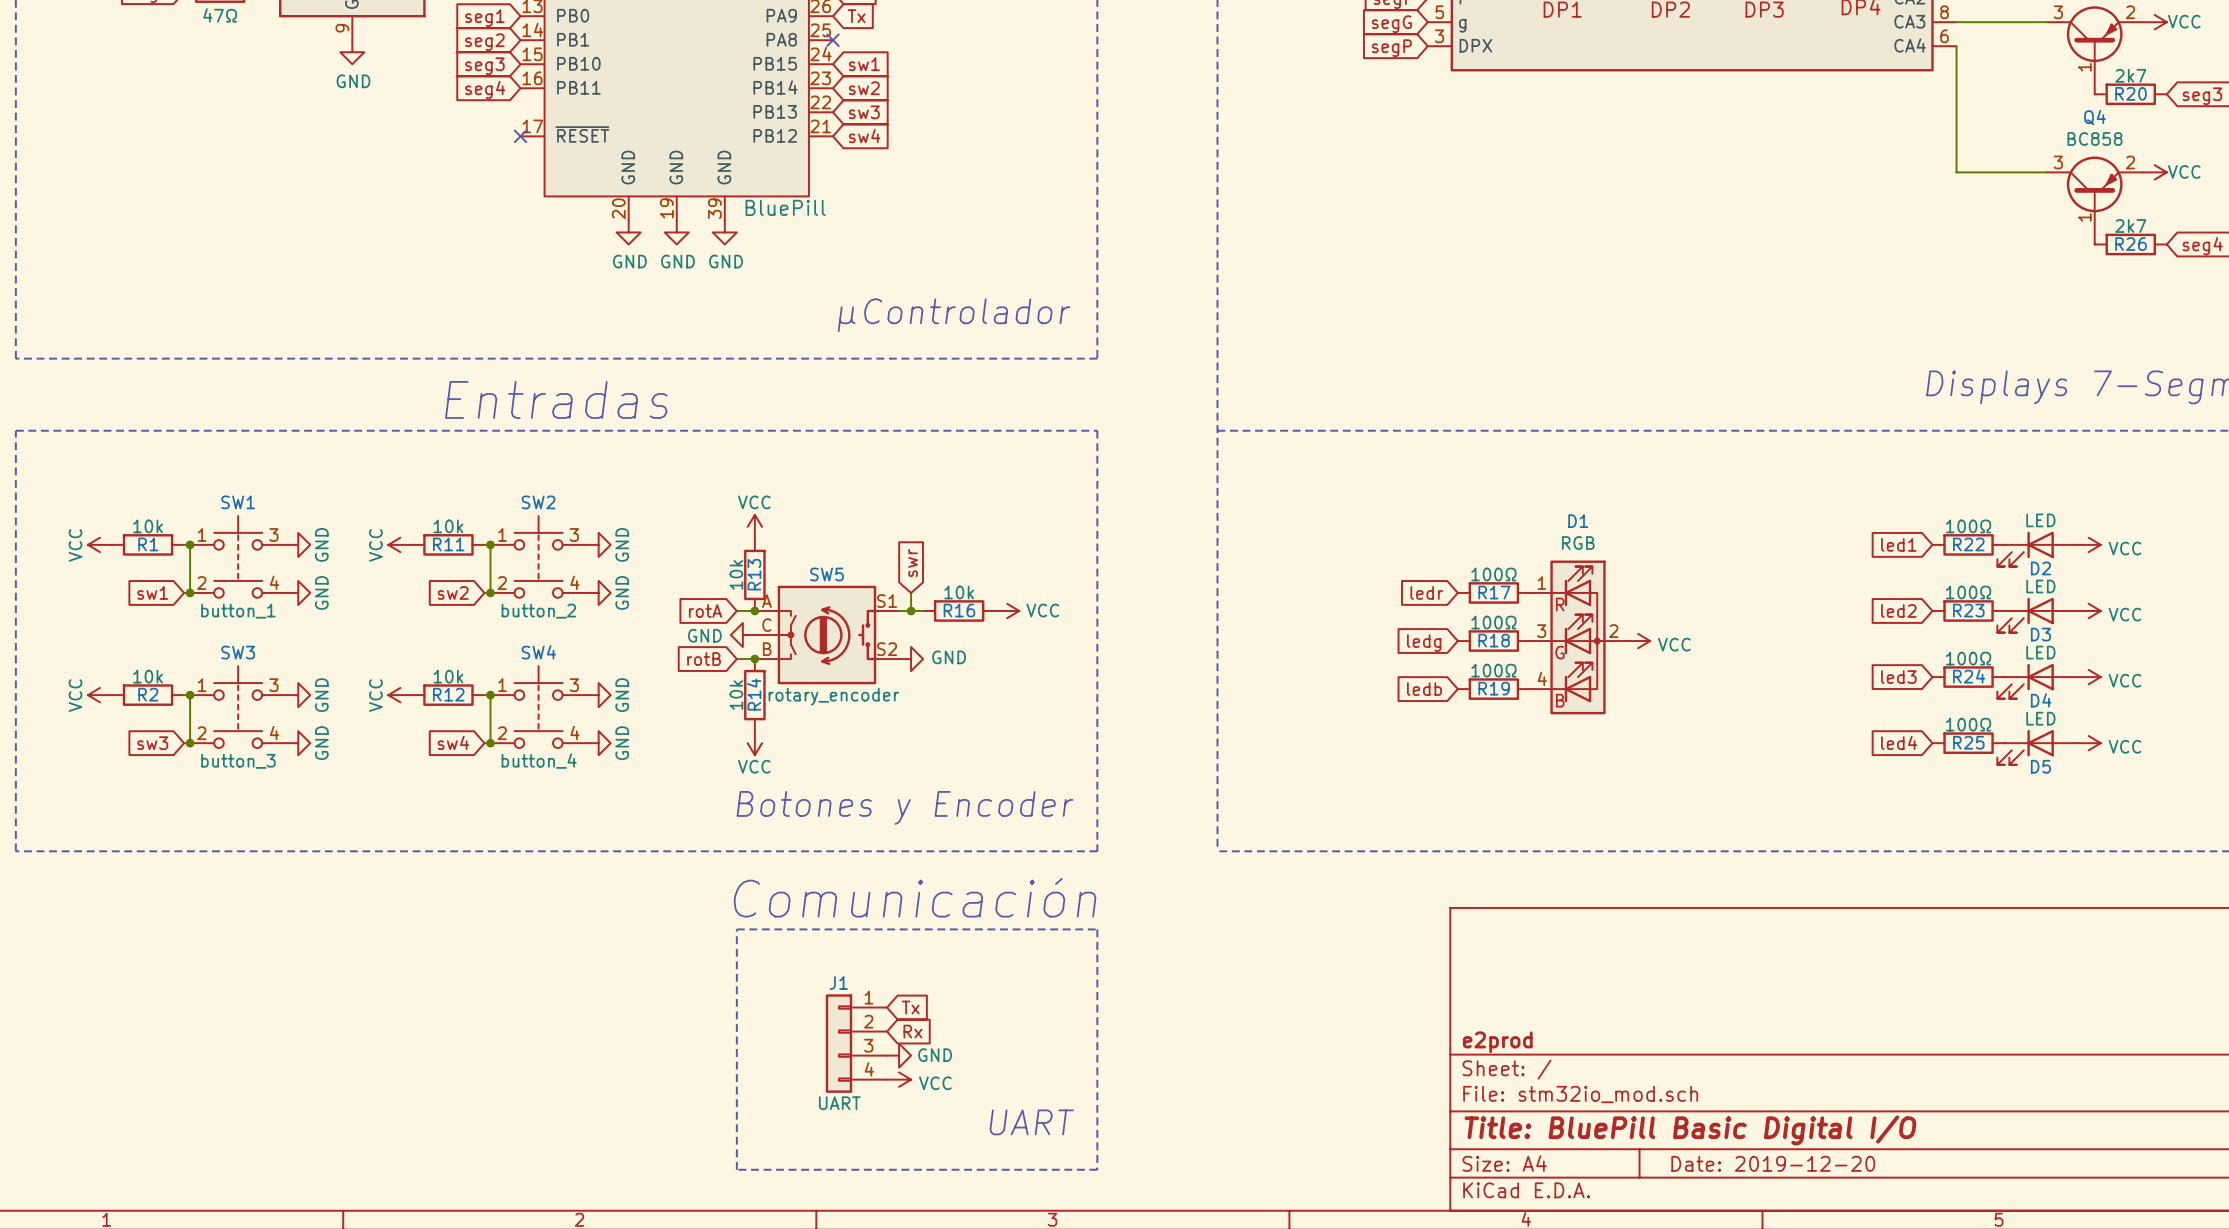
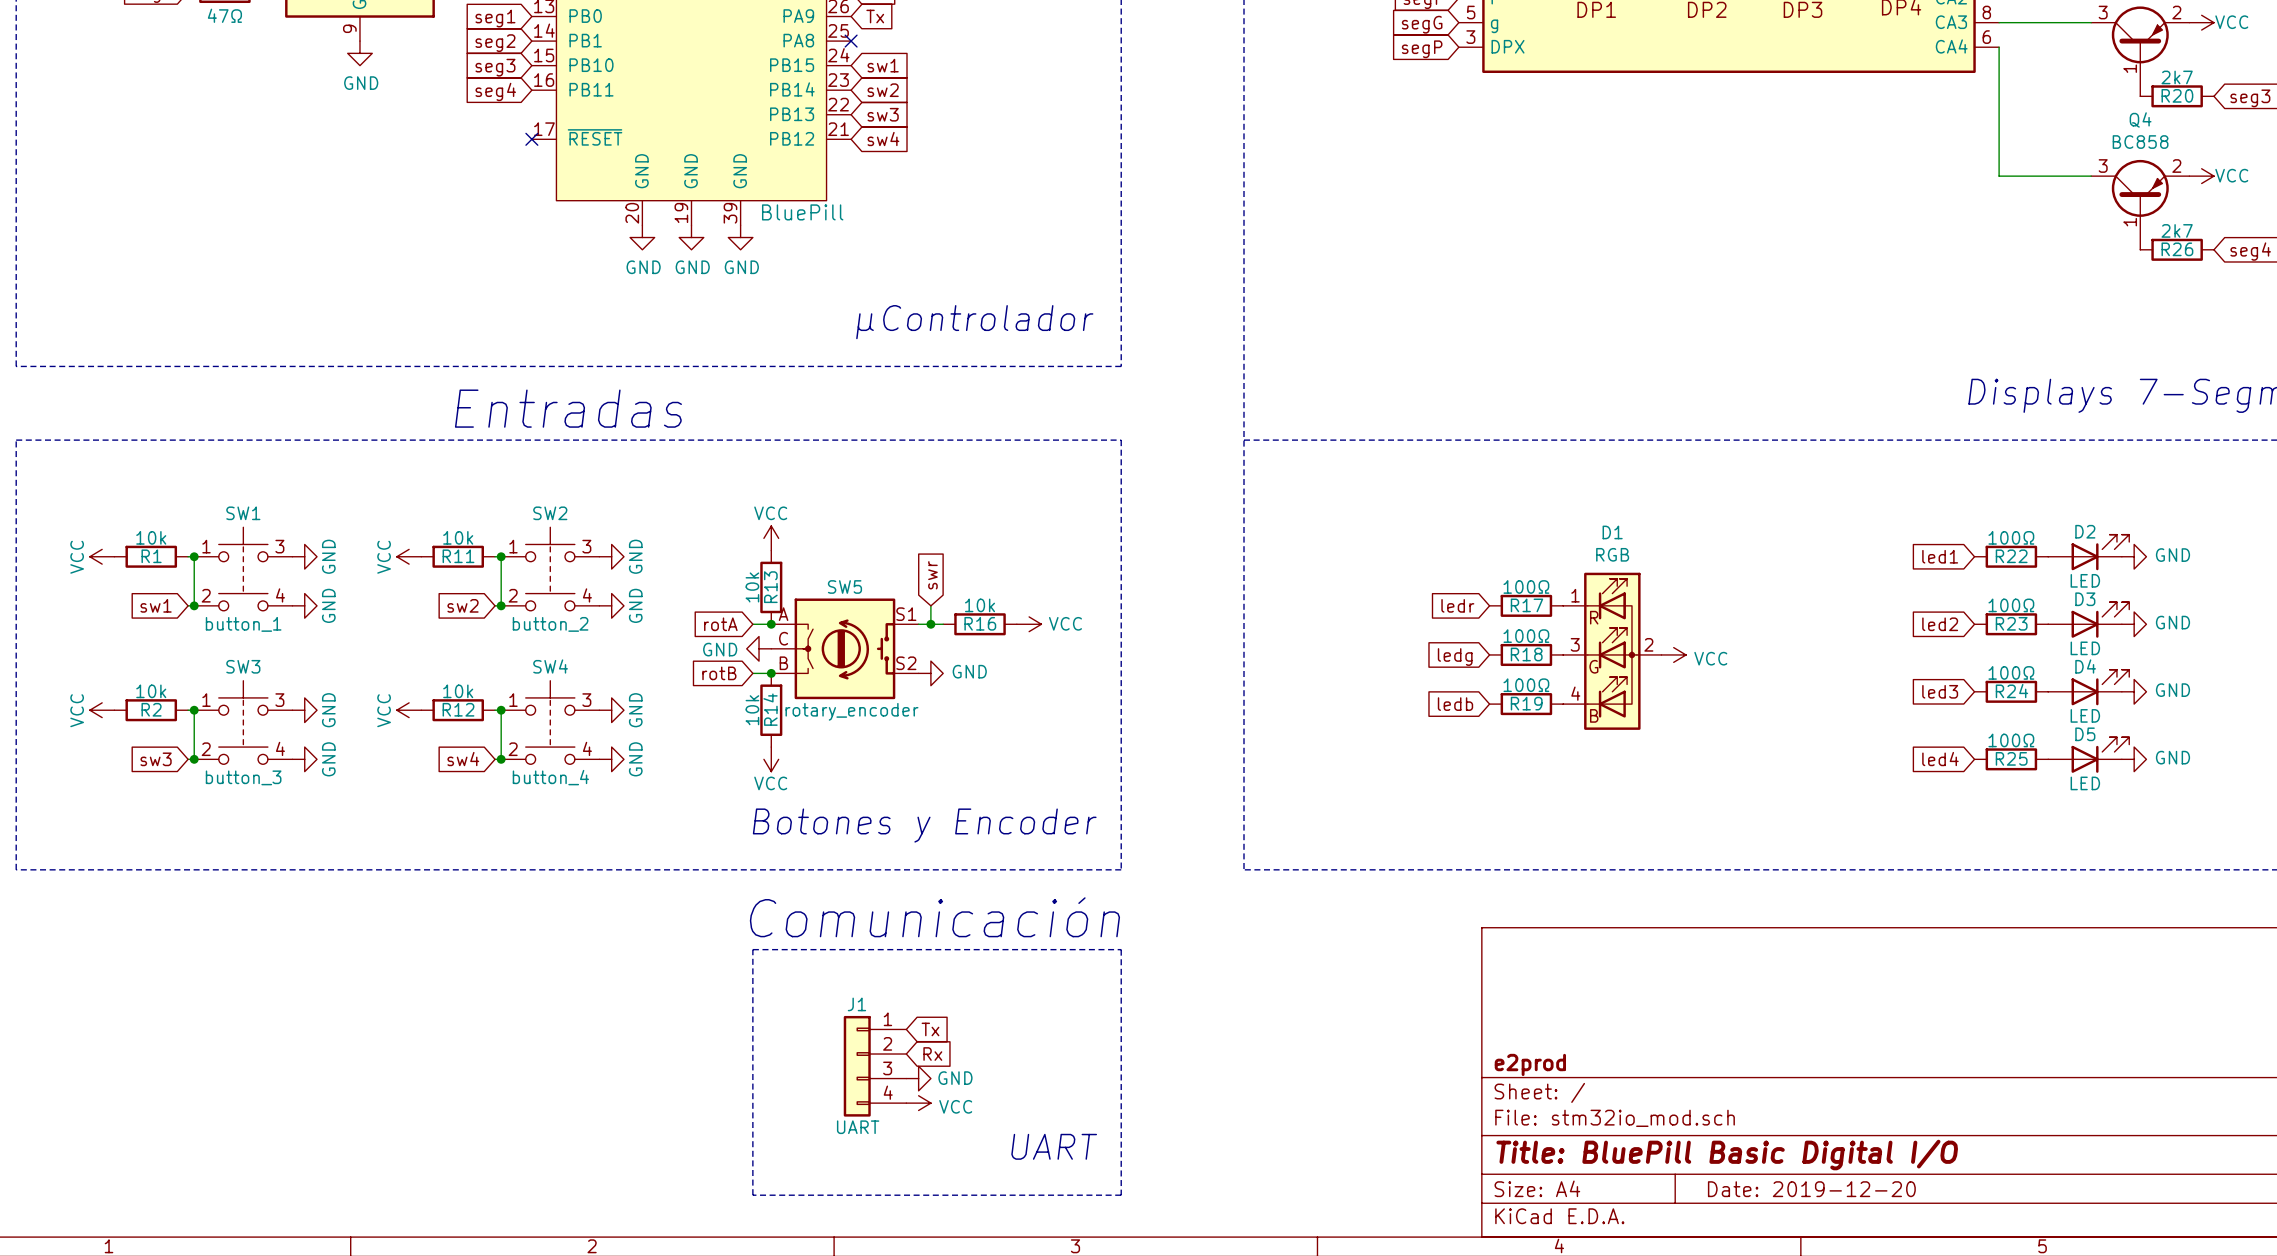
power symbol: VCC (2088, 544) -> GND (2134, 556)
D2 rotation: 0° (2025, 549) -> 180° (2100, 552)
power symbol: VCC (2088, 610) -> GND (2134, 624)
D3 rotation: 0° (2025, 615) -> 180° (2100, 619)
power symbol: VCC (2088, 677) -> GND (2134, 691)
D4 rotation: 0° (2025, 681) -> 180° (2100, 687)
power symbol: VCC (2088, 743) -> GND (2134, 759)
D5 rotation: 0° (2025, 747) -> 180° (2100, 755)

